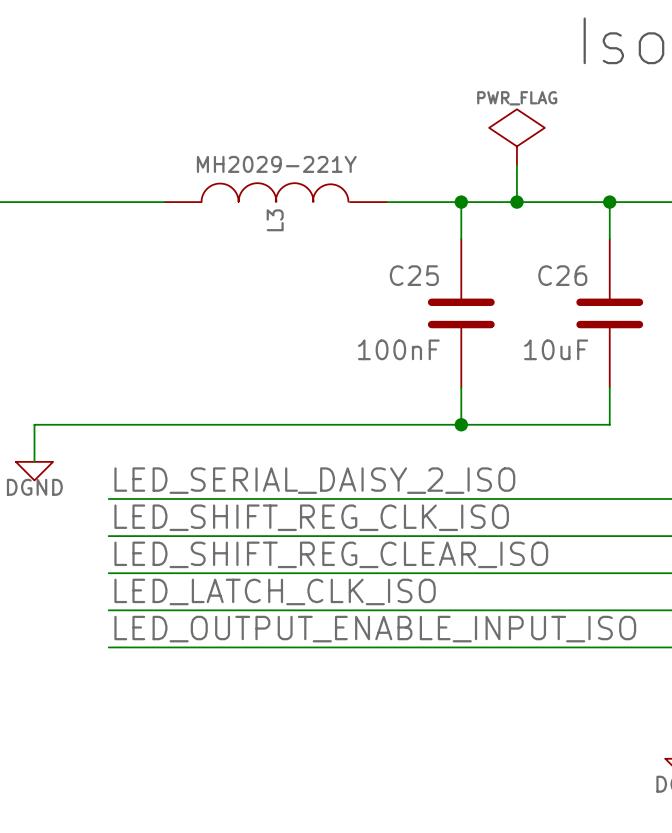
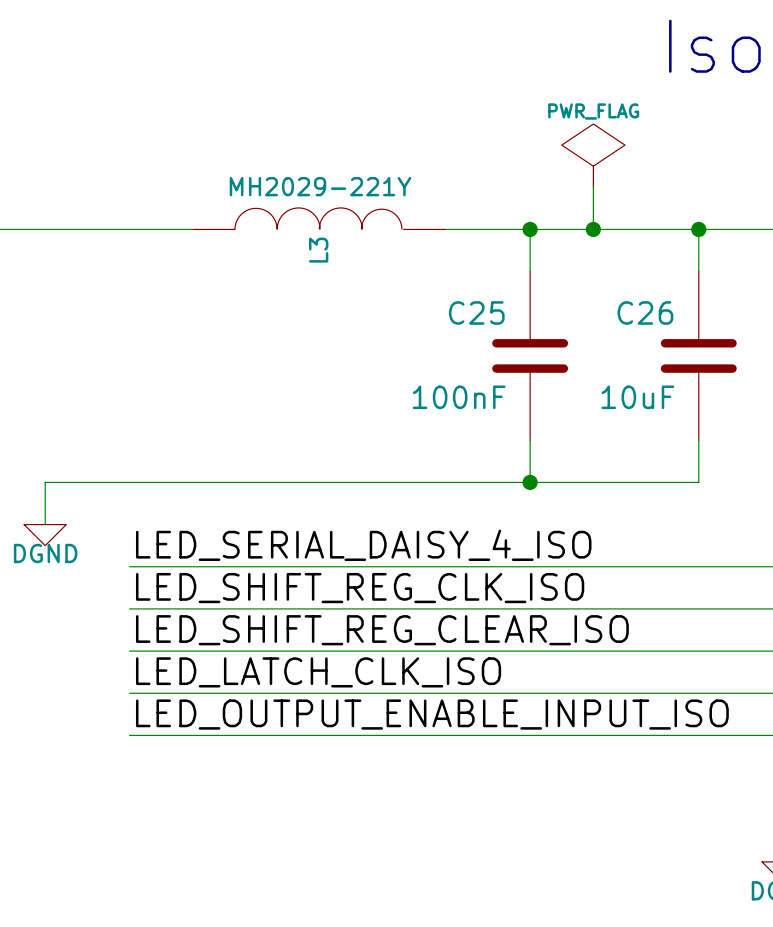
label: LED_SERIAL_DAISY_2_ISO (314, 480) -> LED_SERIAL_DAISY_4_ISO (363, 545)

